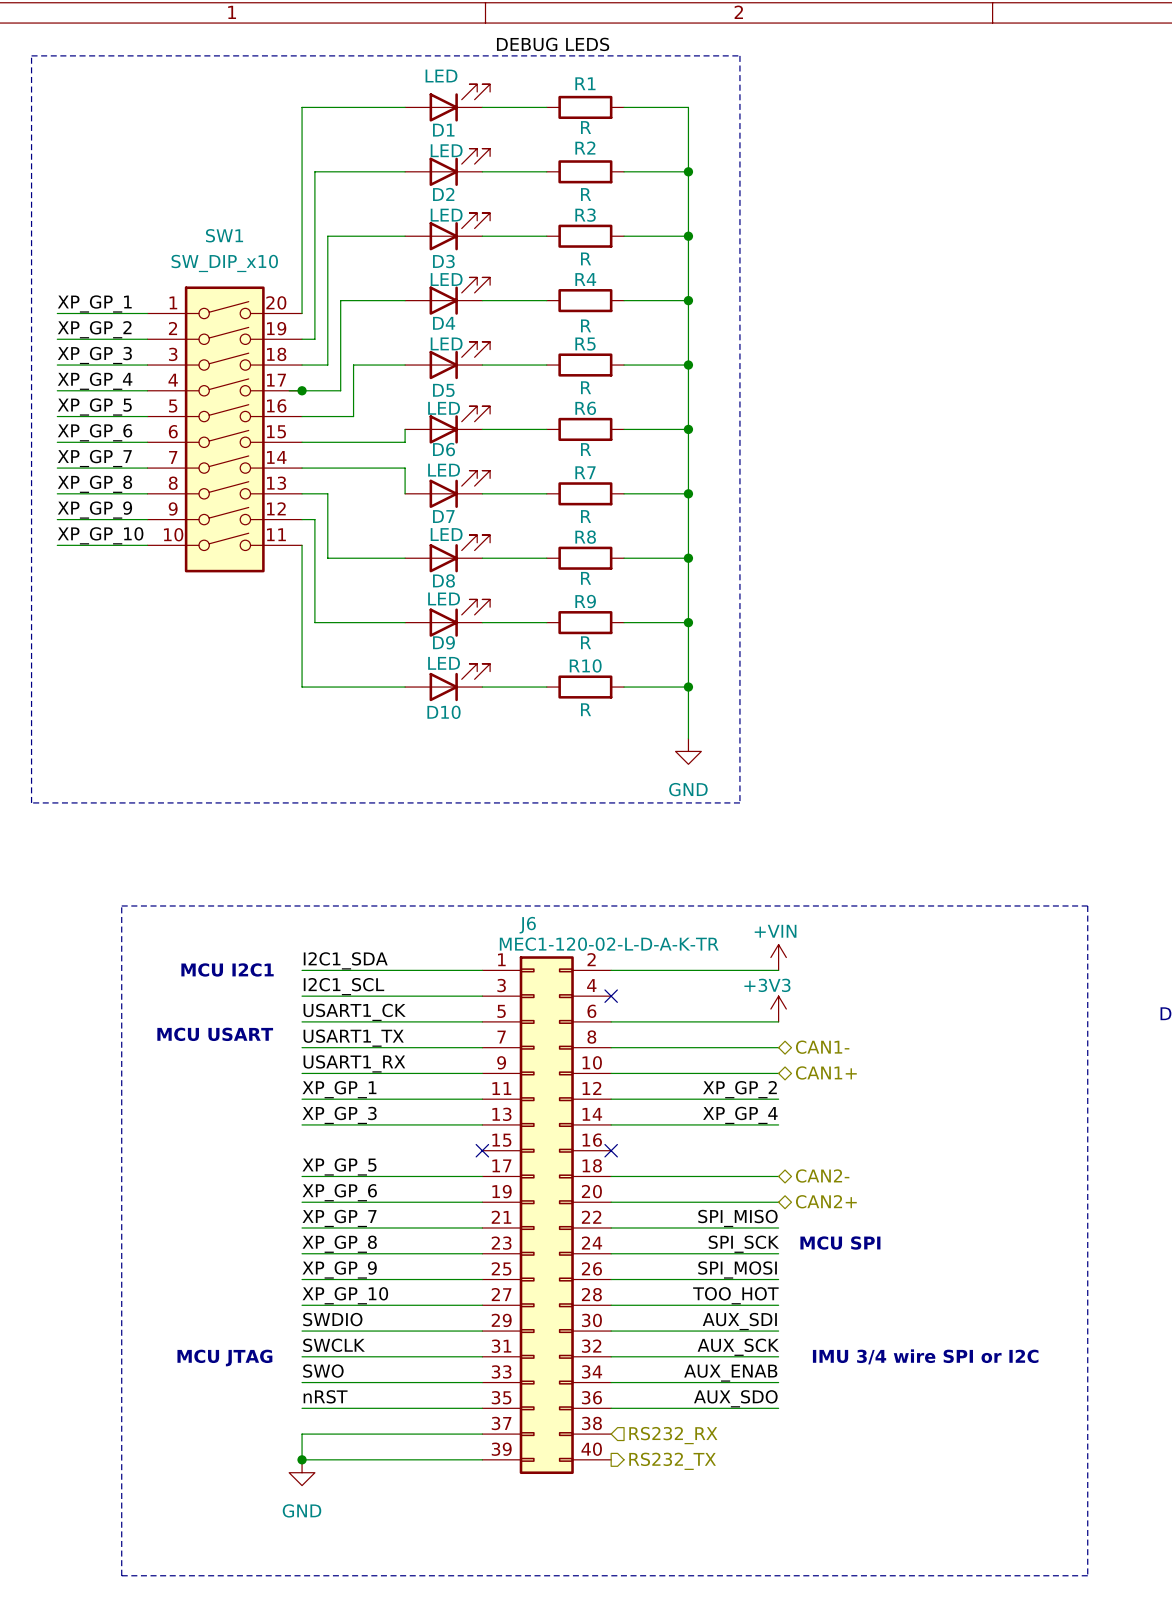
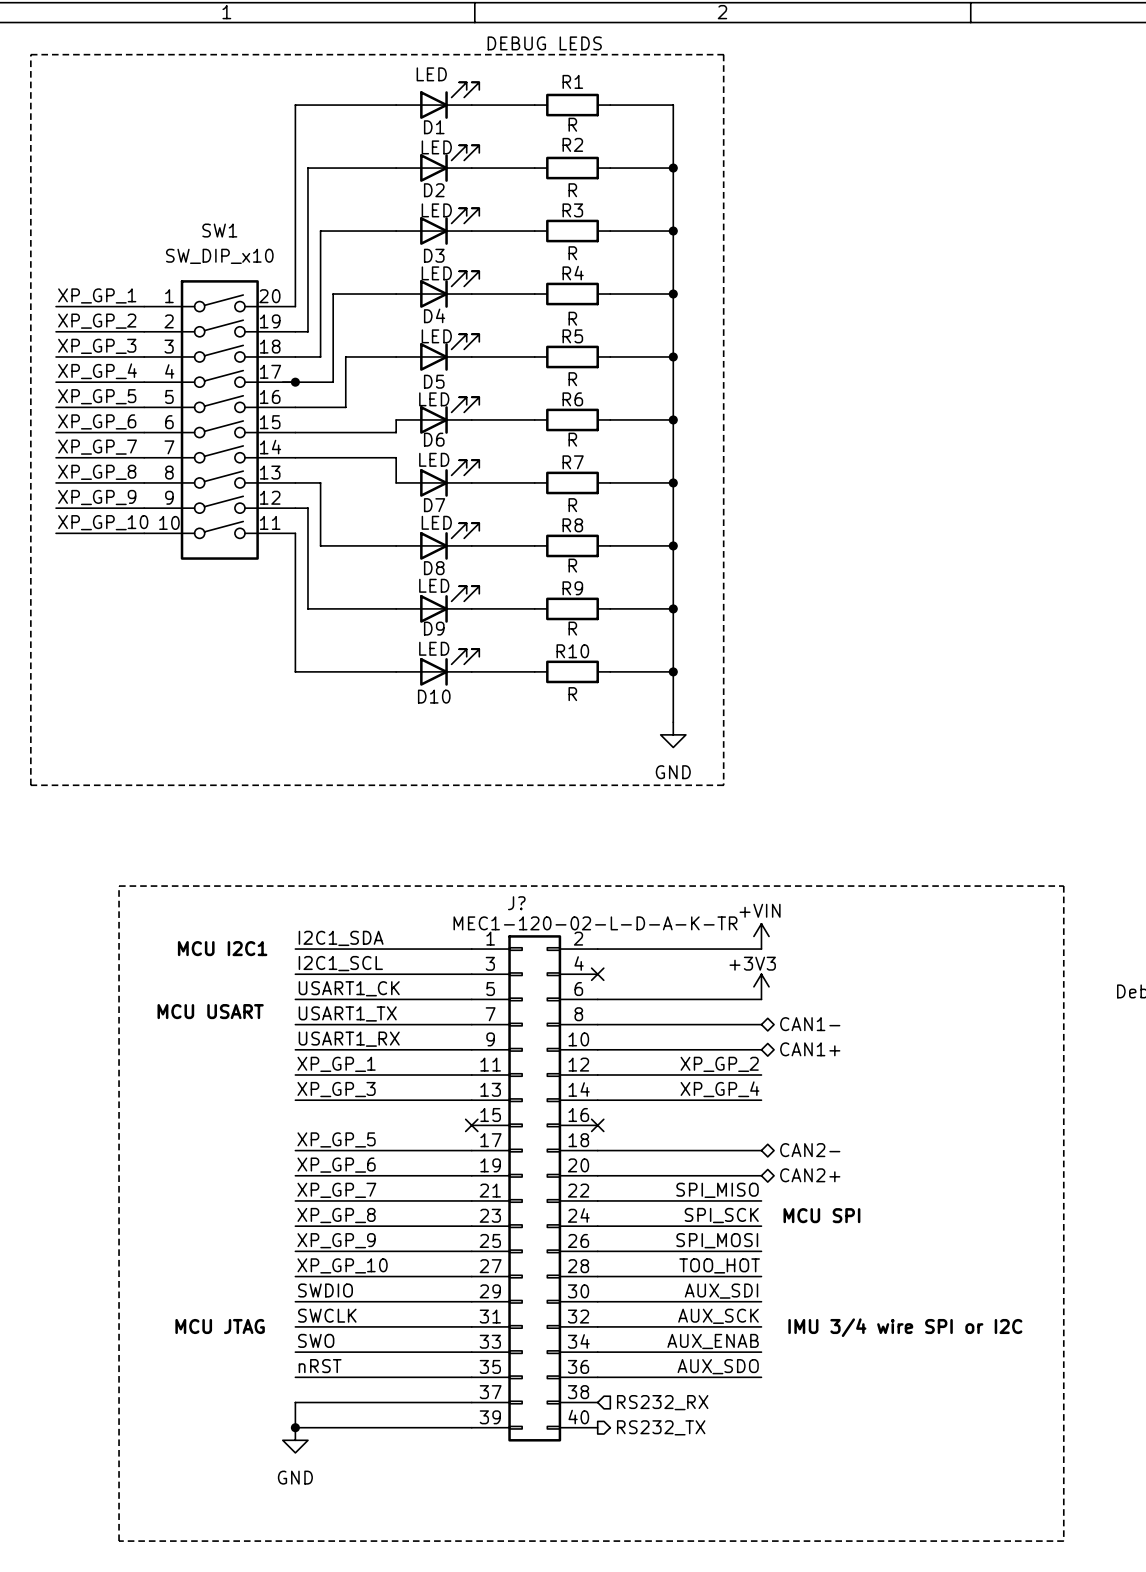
J6 name: J6 (527, 925) -> J? (516, 903)

